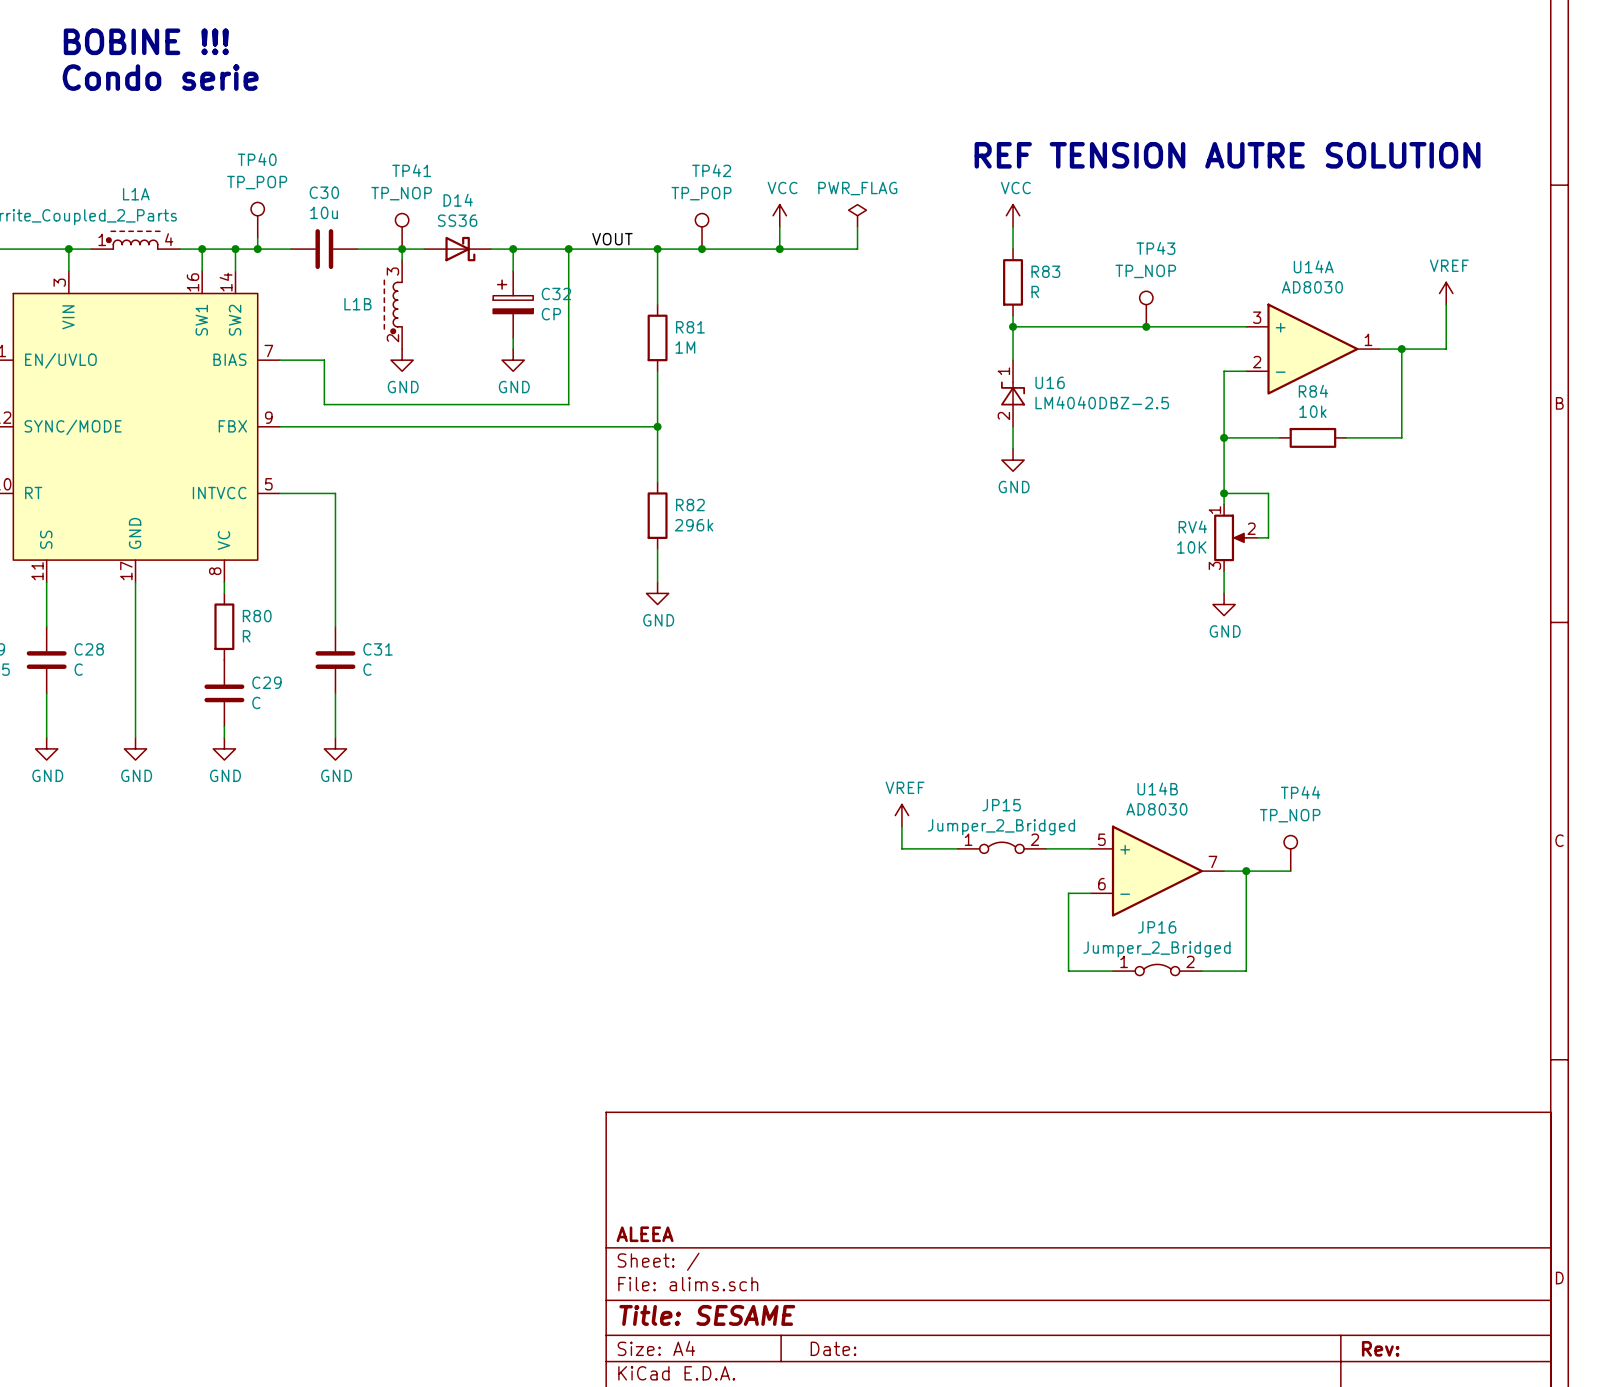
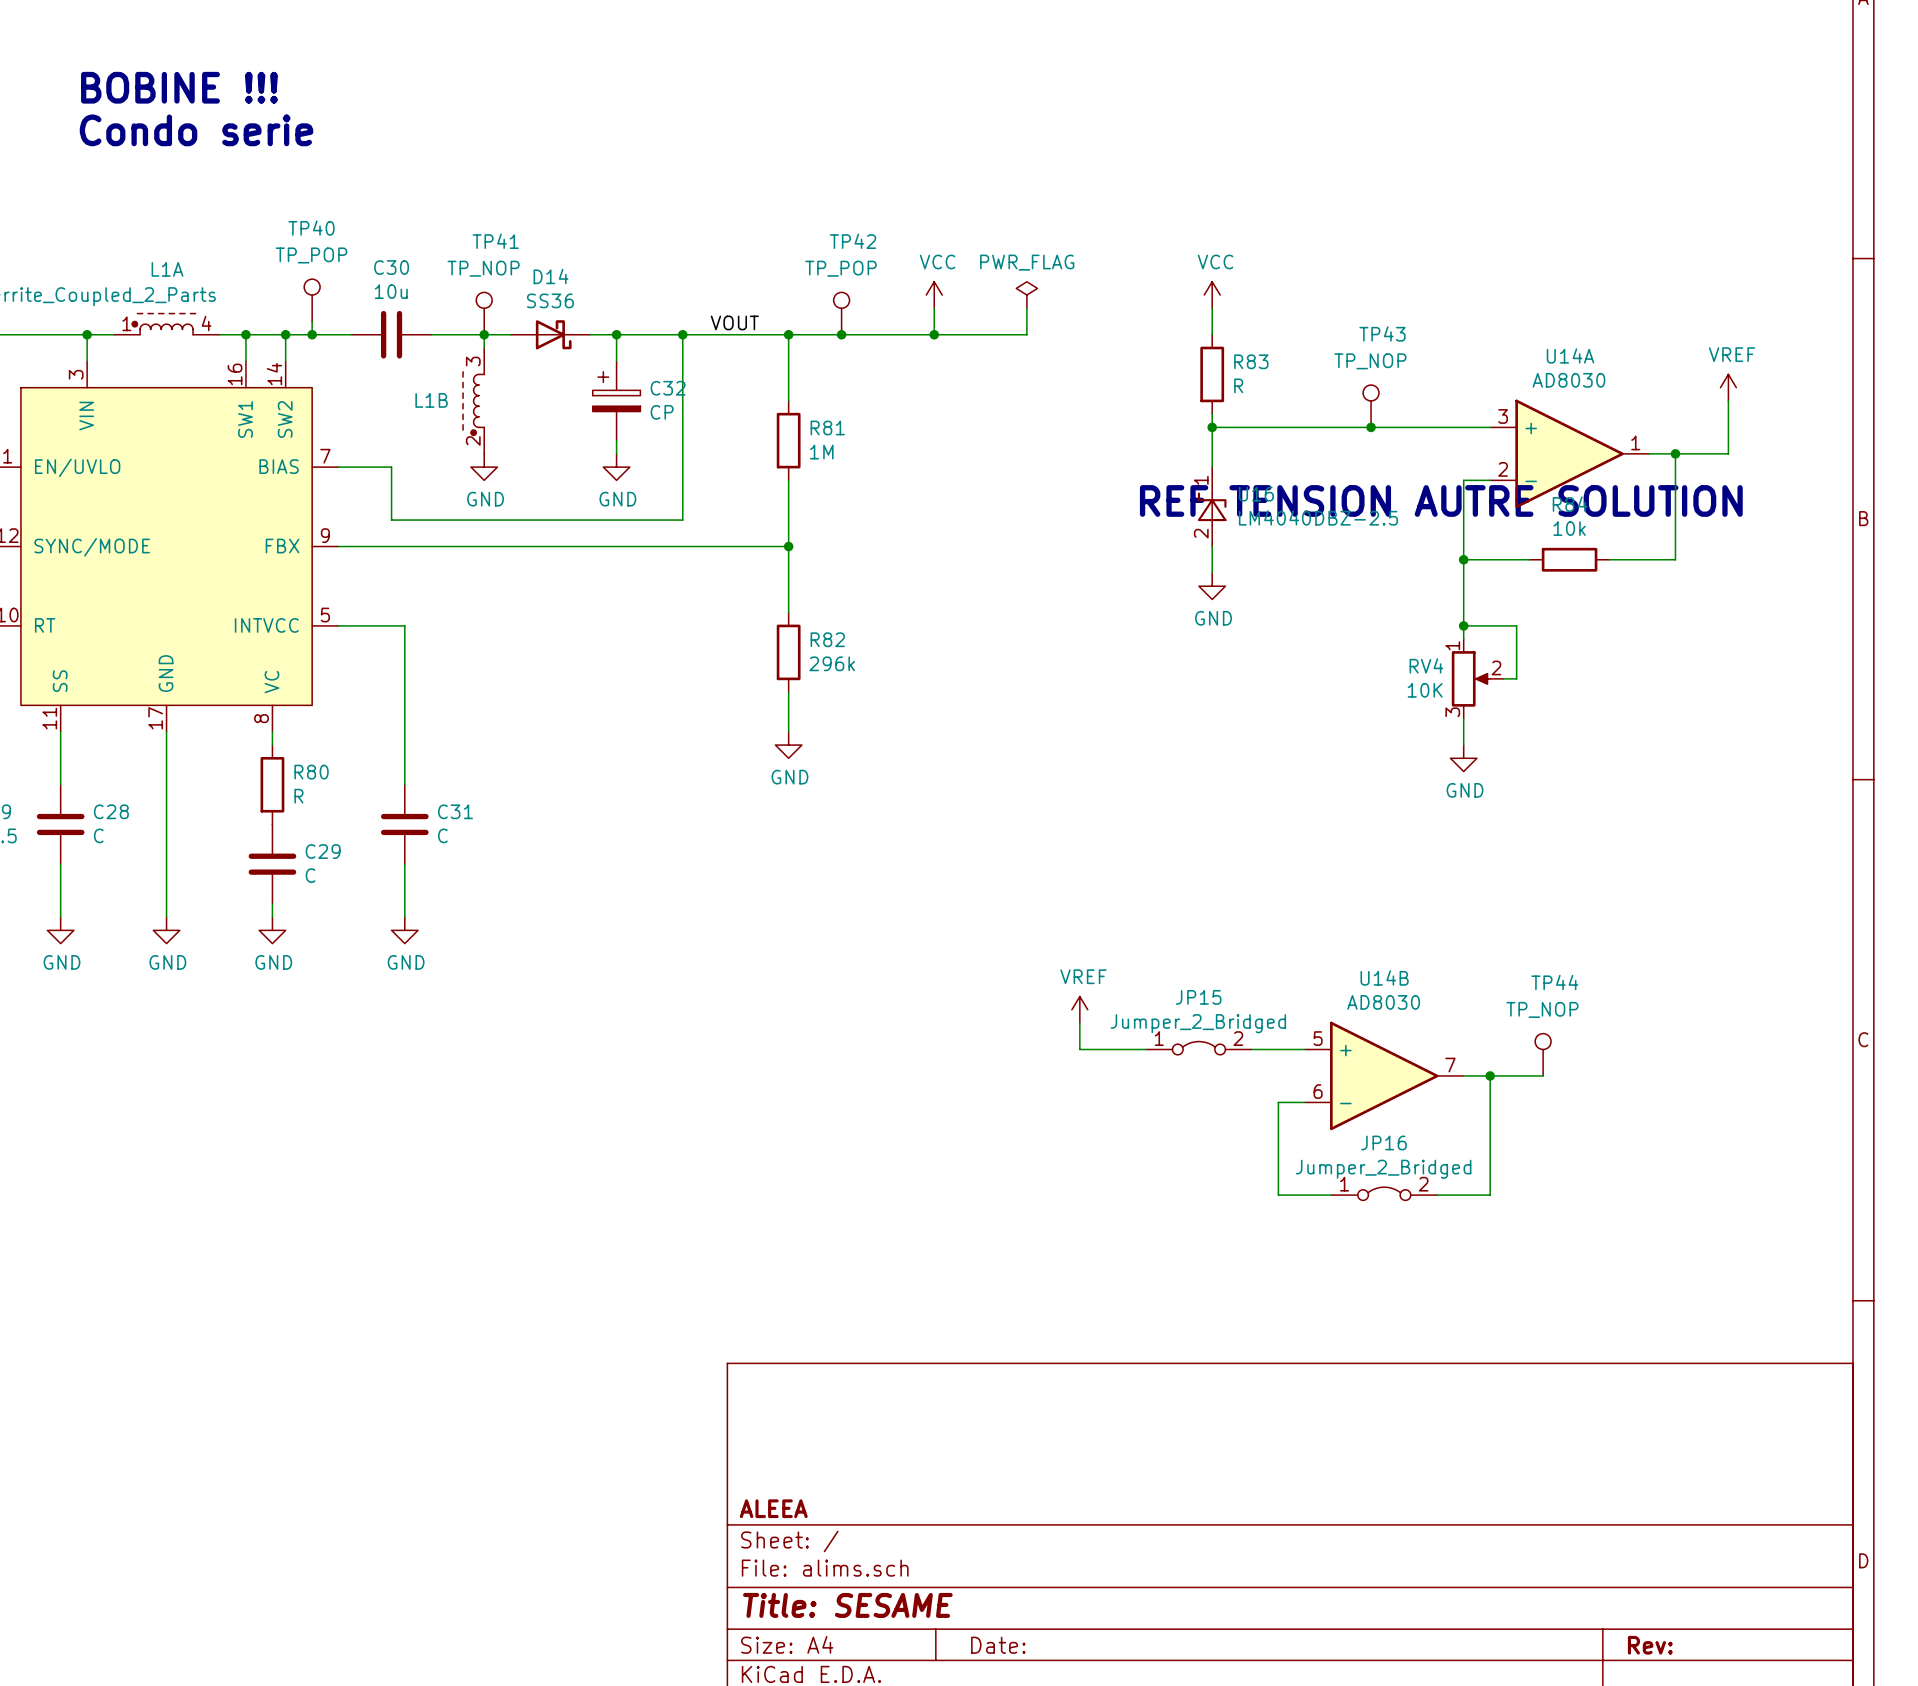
text: REF TENSION AUTRE SOLUTION (1227, 155) -> none
text: none -> REF TENSION AUTRE SOLUTION (1441, 500)

